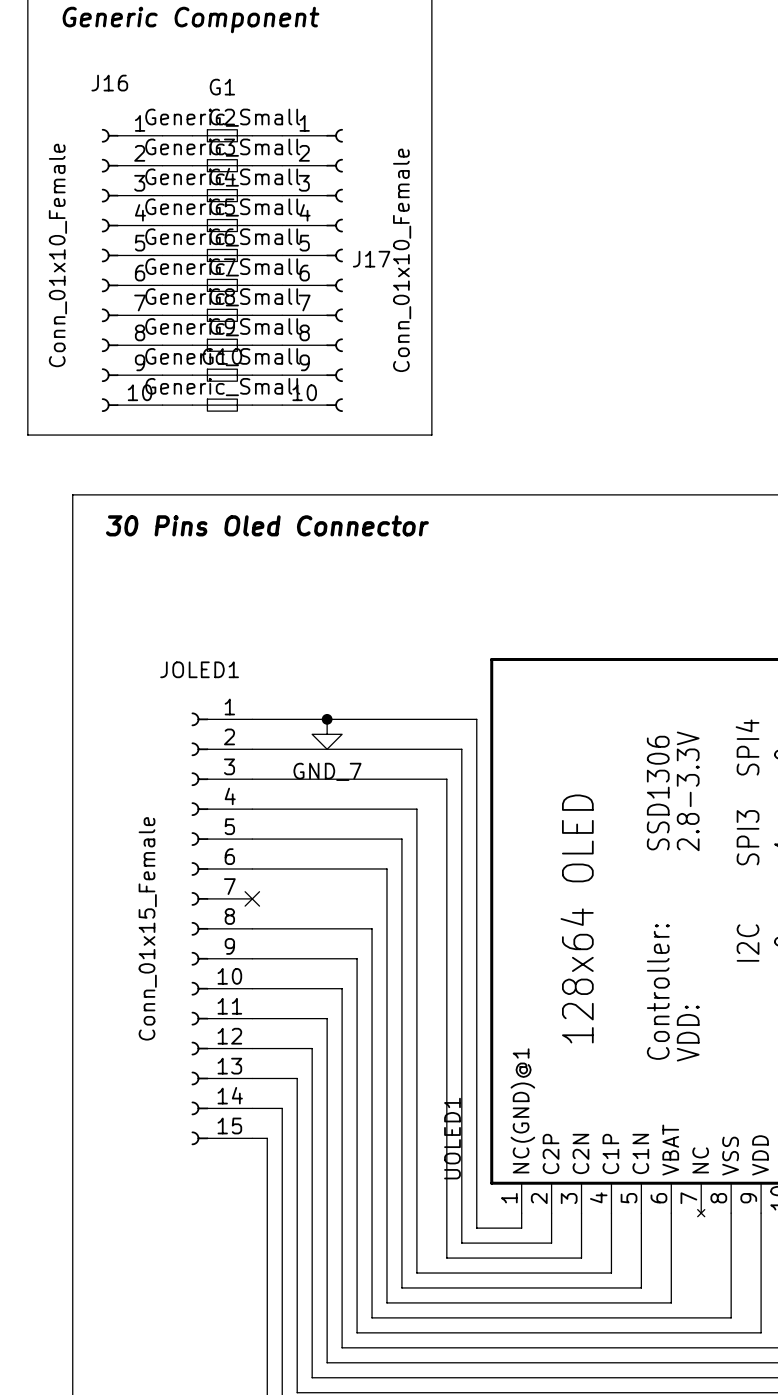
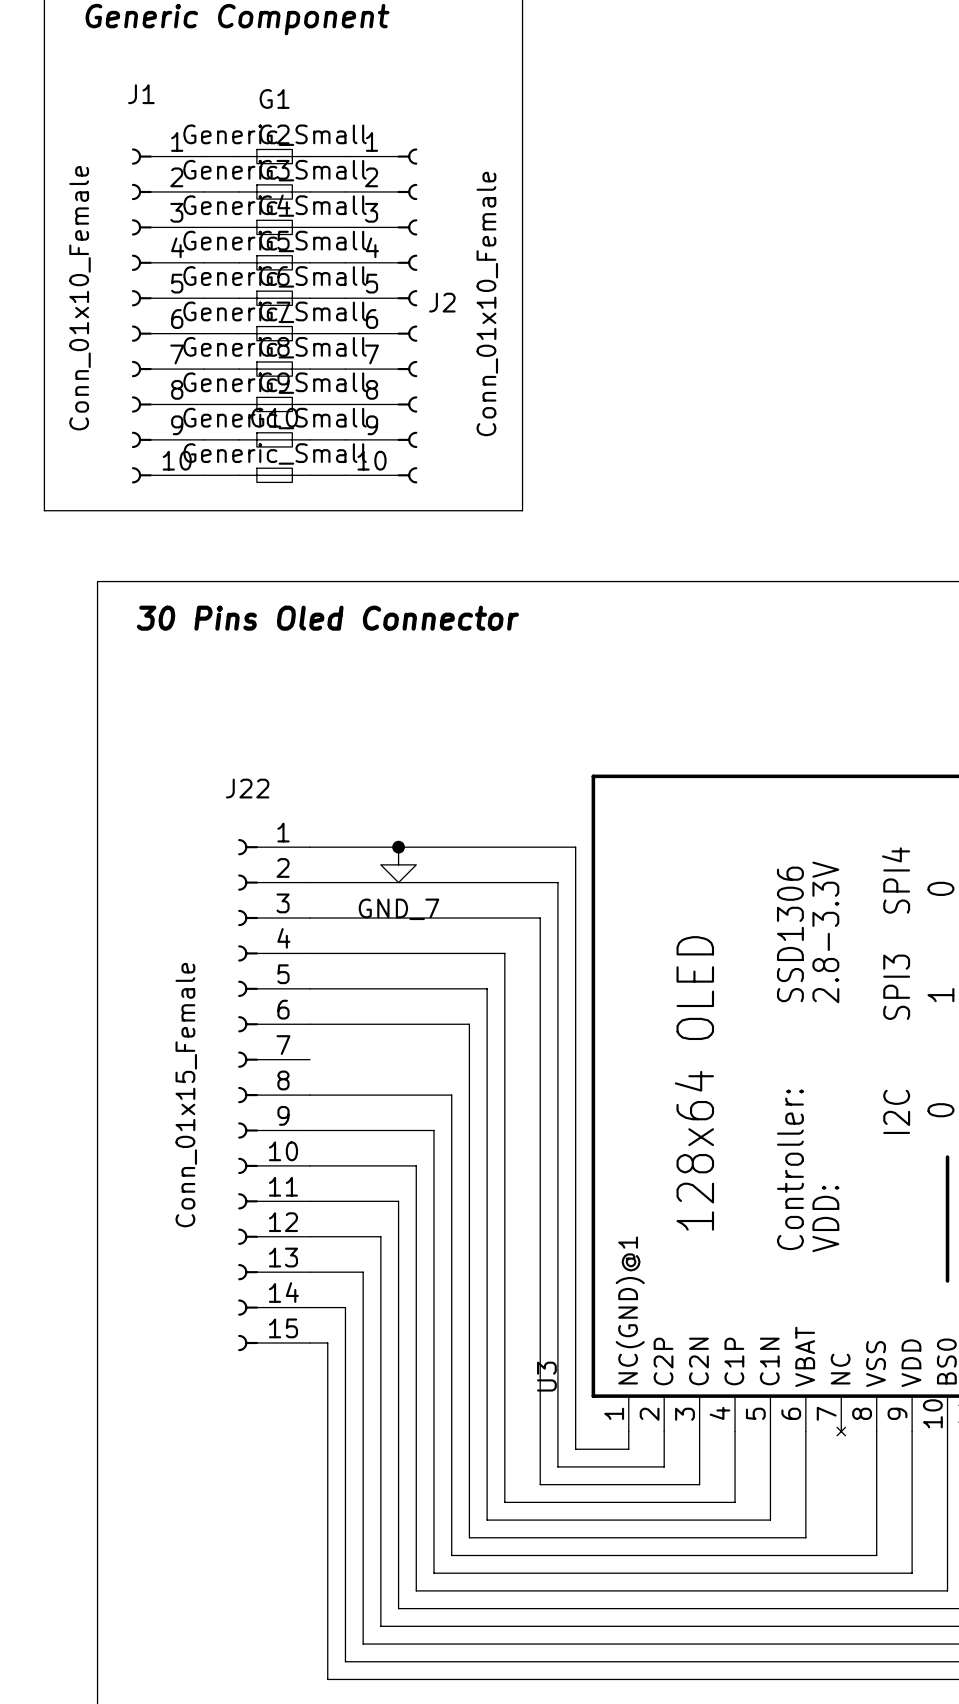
J16 name: J16 (109, 83) -> J1 (141, 94)
J17 name: J17 (371, 259) -> J2 (442, 302)
JOLED1 name: JOLED1 (199, 669) -> J22 (247, 788)
no-connect mark: (252, 898) -> none
UOLED1 name: UOLED1 (452, 1138) -> U3 (546, 1376)

